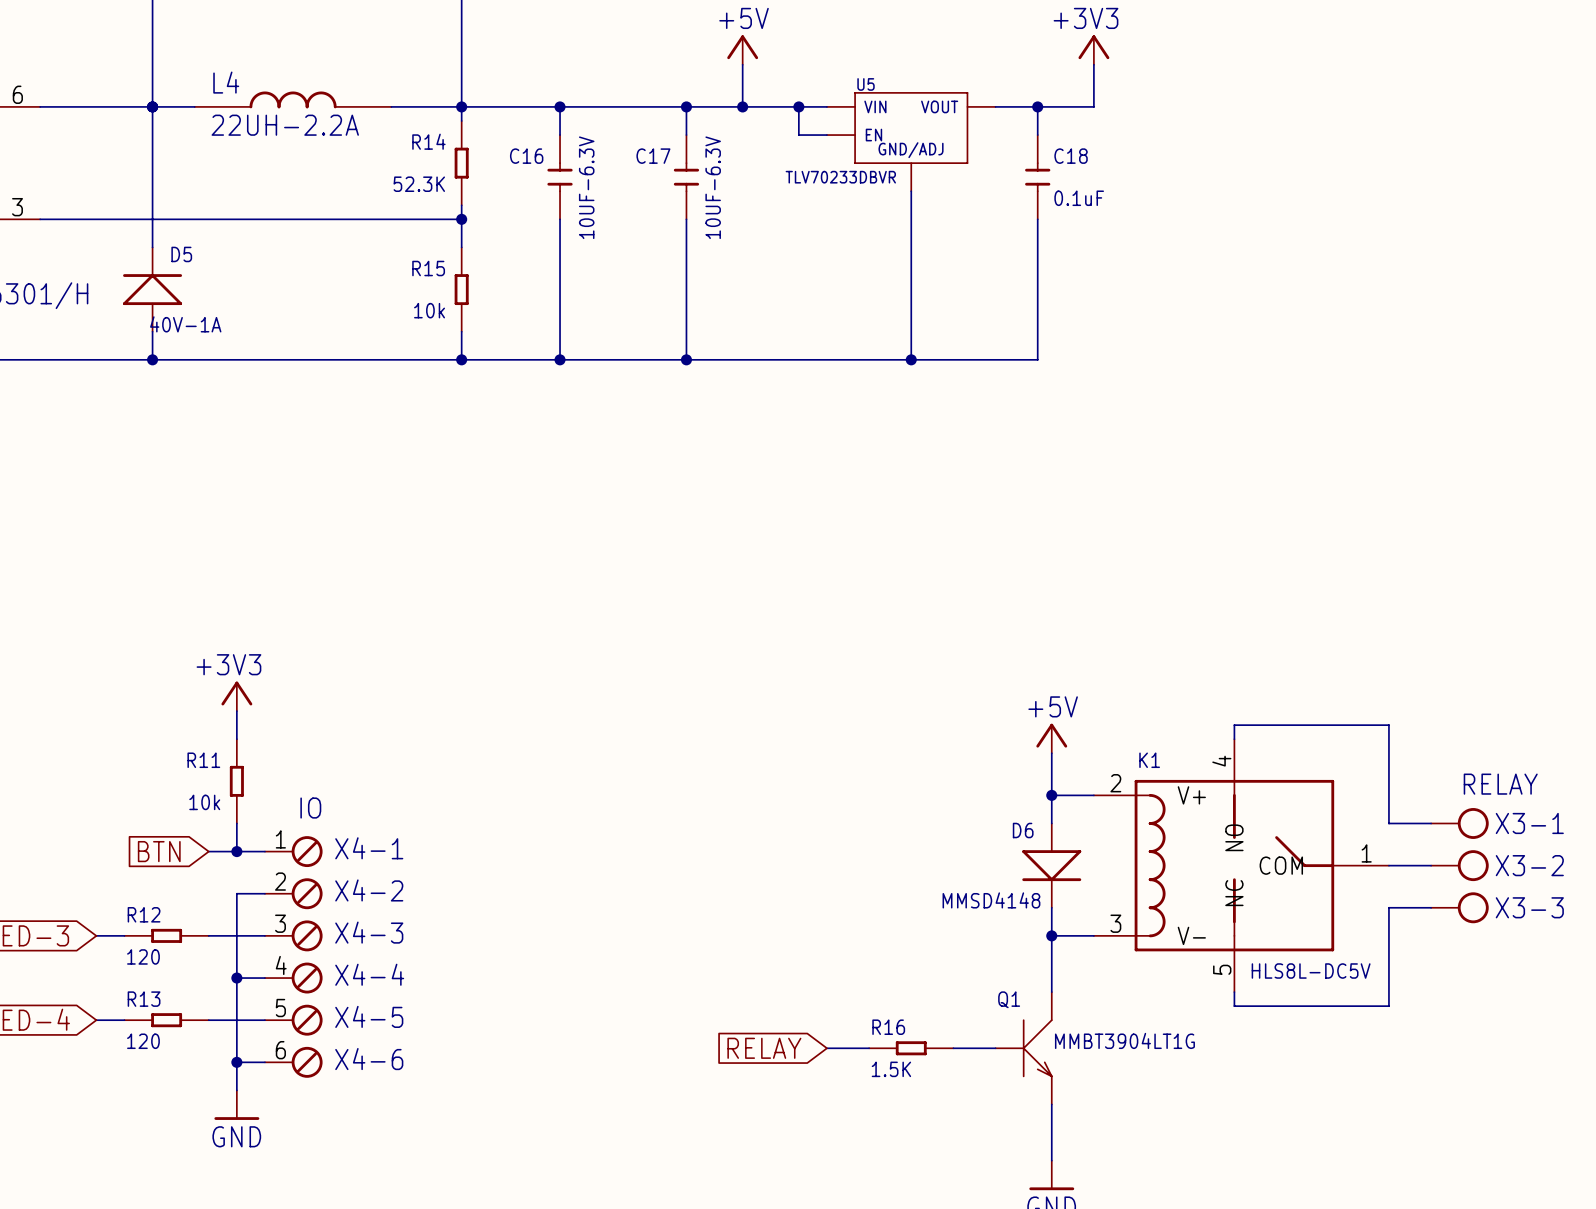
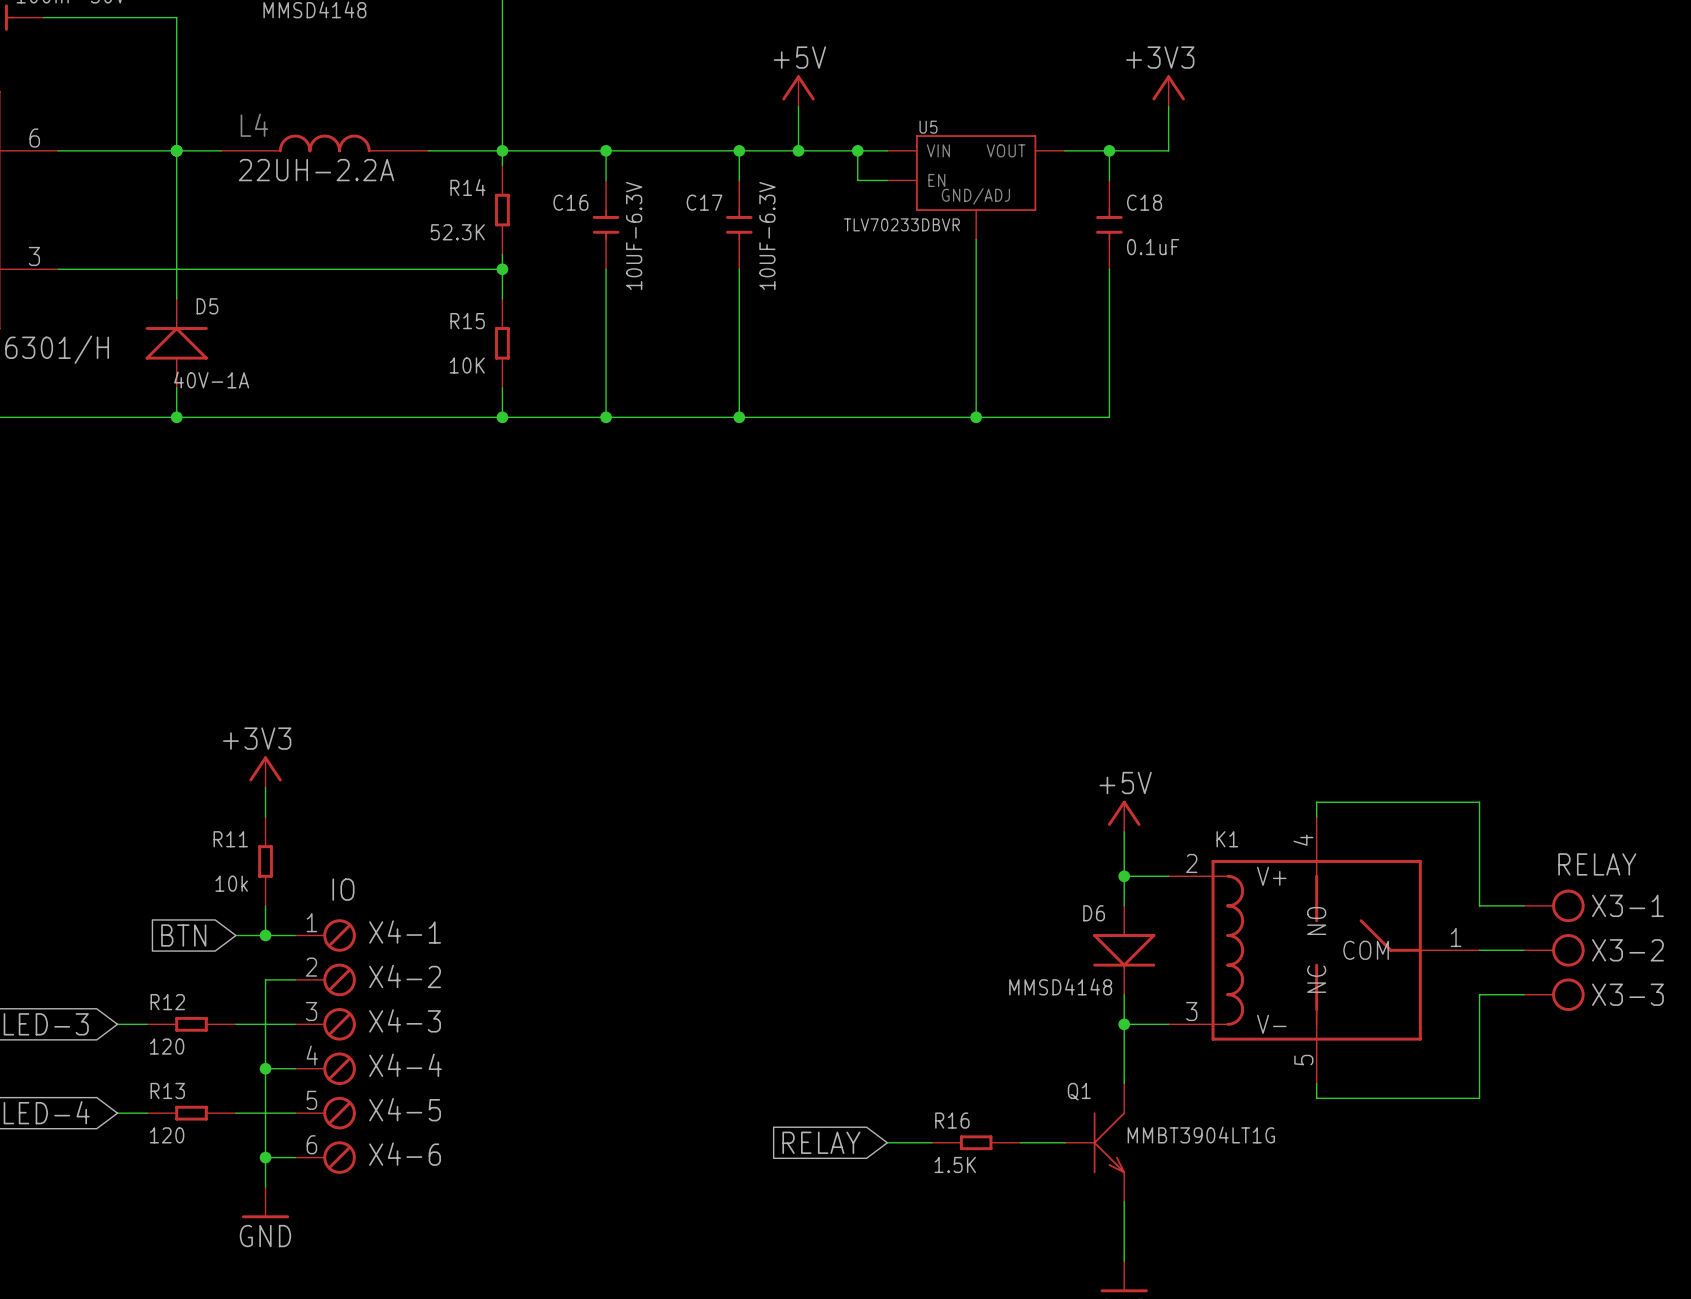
R15 value: 10k (429, 310) -> 10K (467, 365)
K1 value: HLS8L-DC5V (1311, 971) -> none

